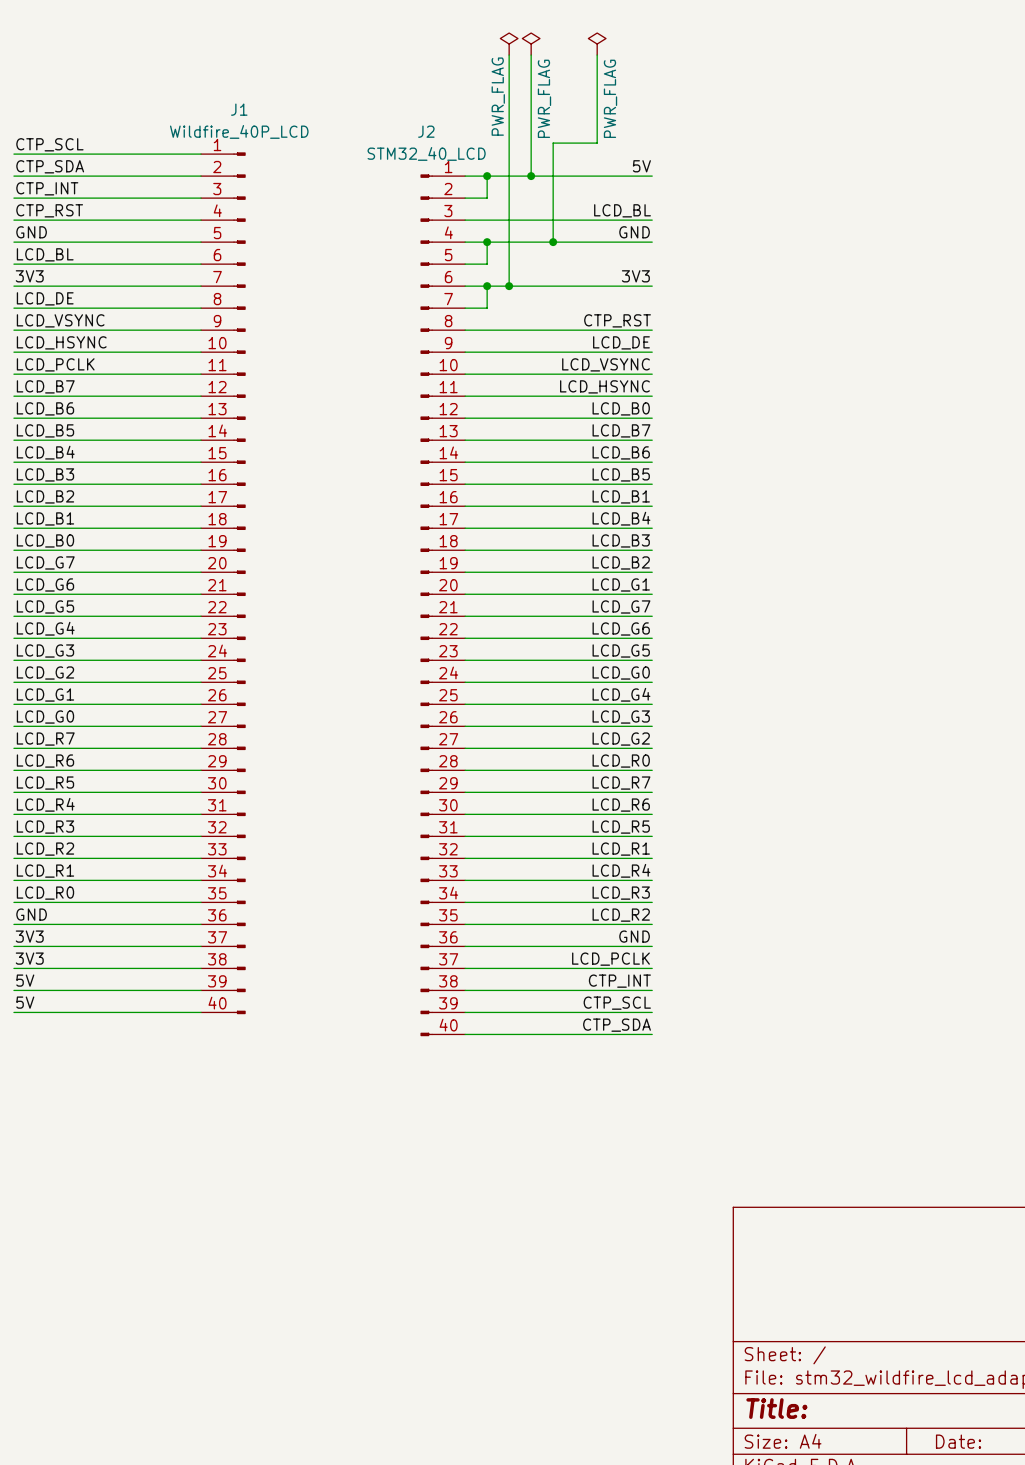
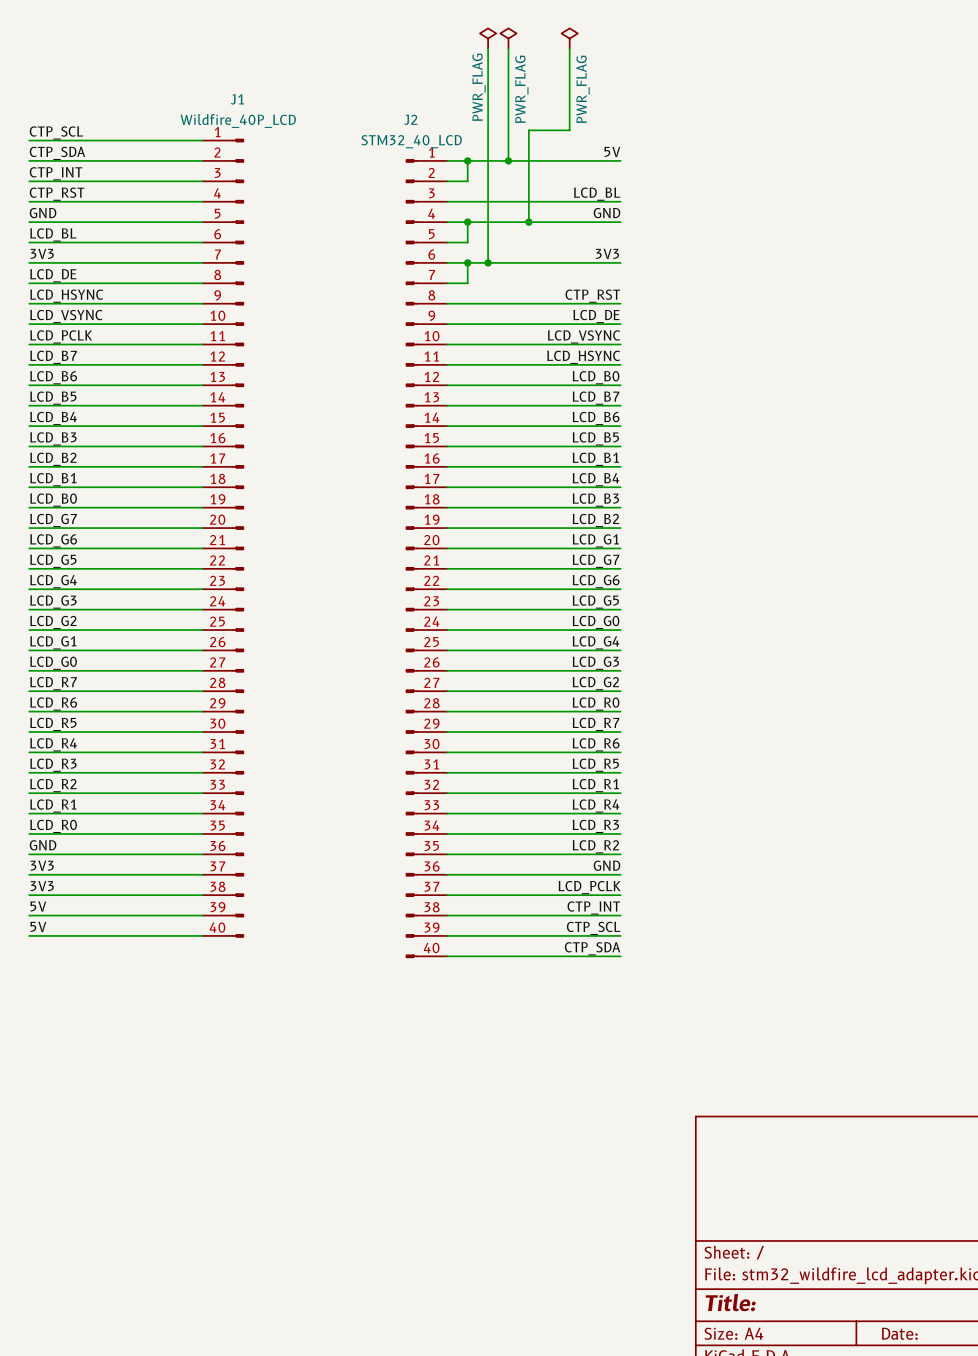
label: LCD_VSYNC (60, 320) -> LCD_HSYNC (66, 296)
label: LCD_HSYNC (61, 342) -> LCD_VSYNC (66, 316)

